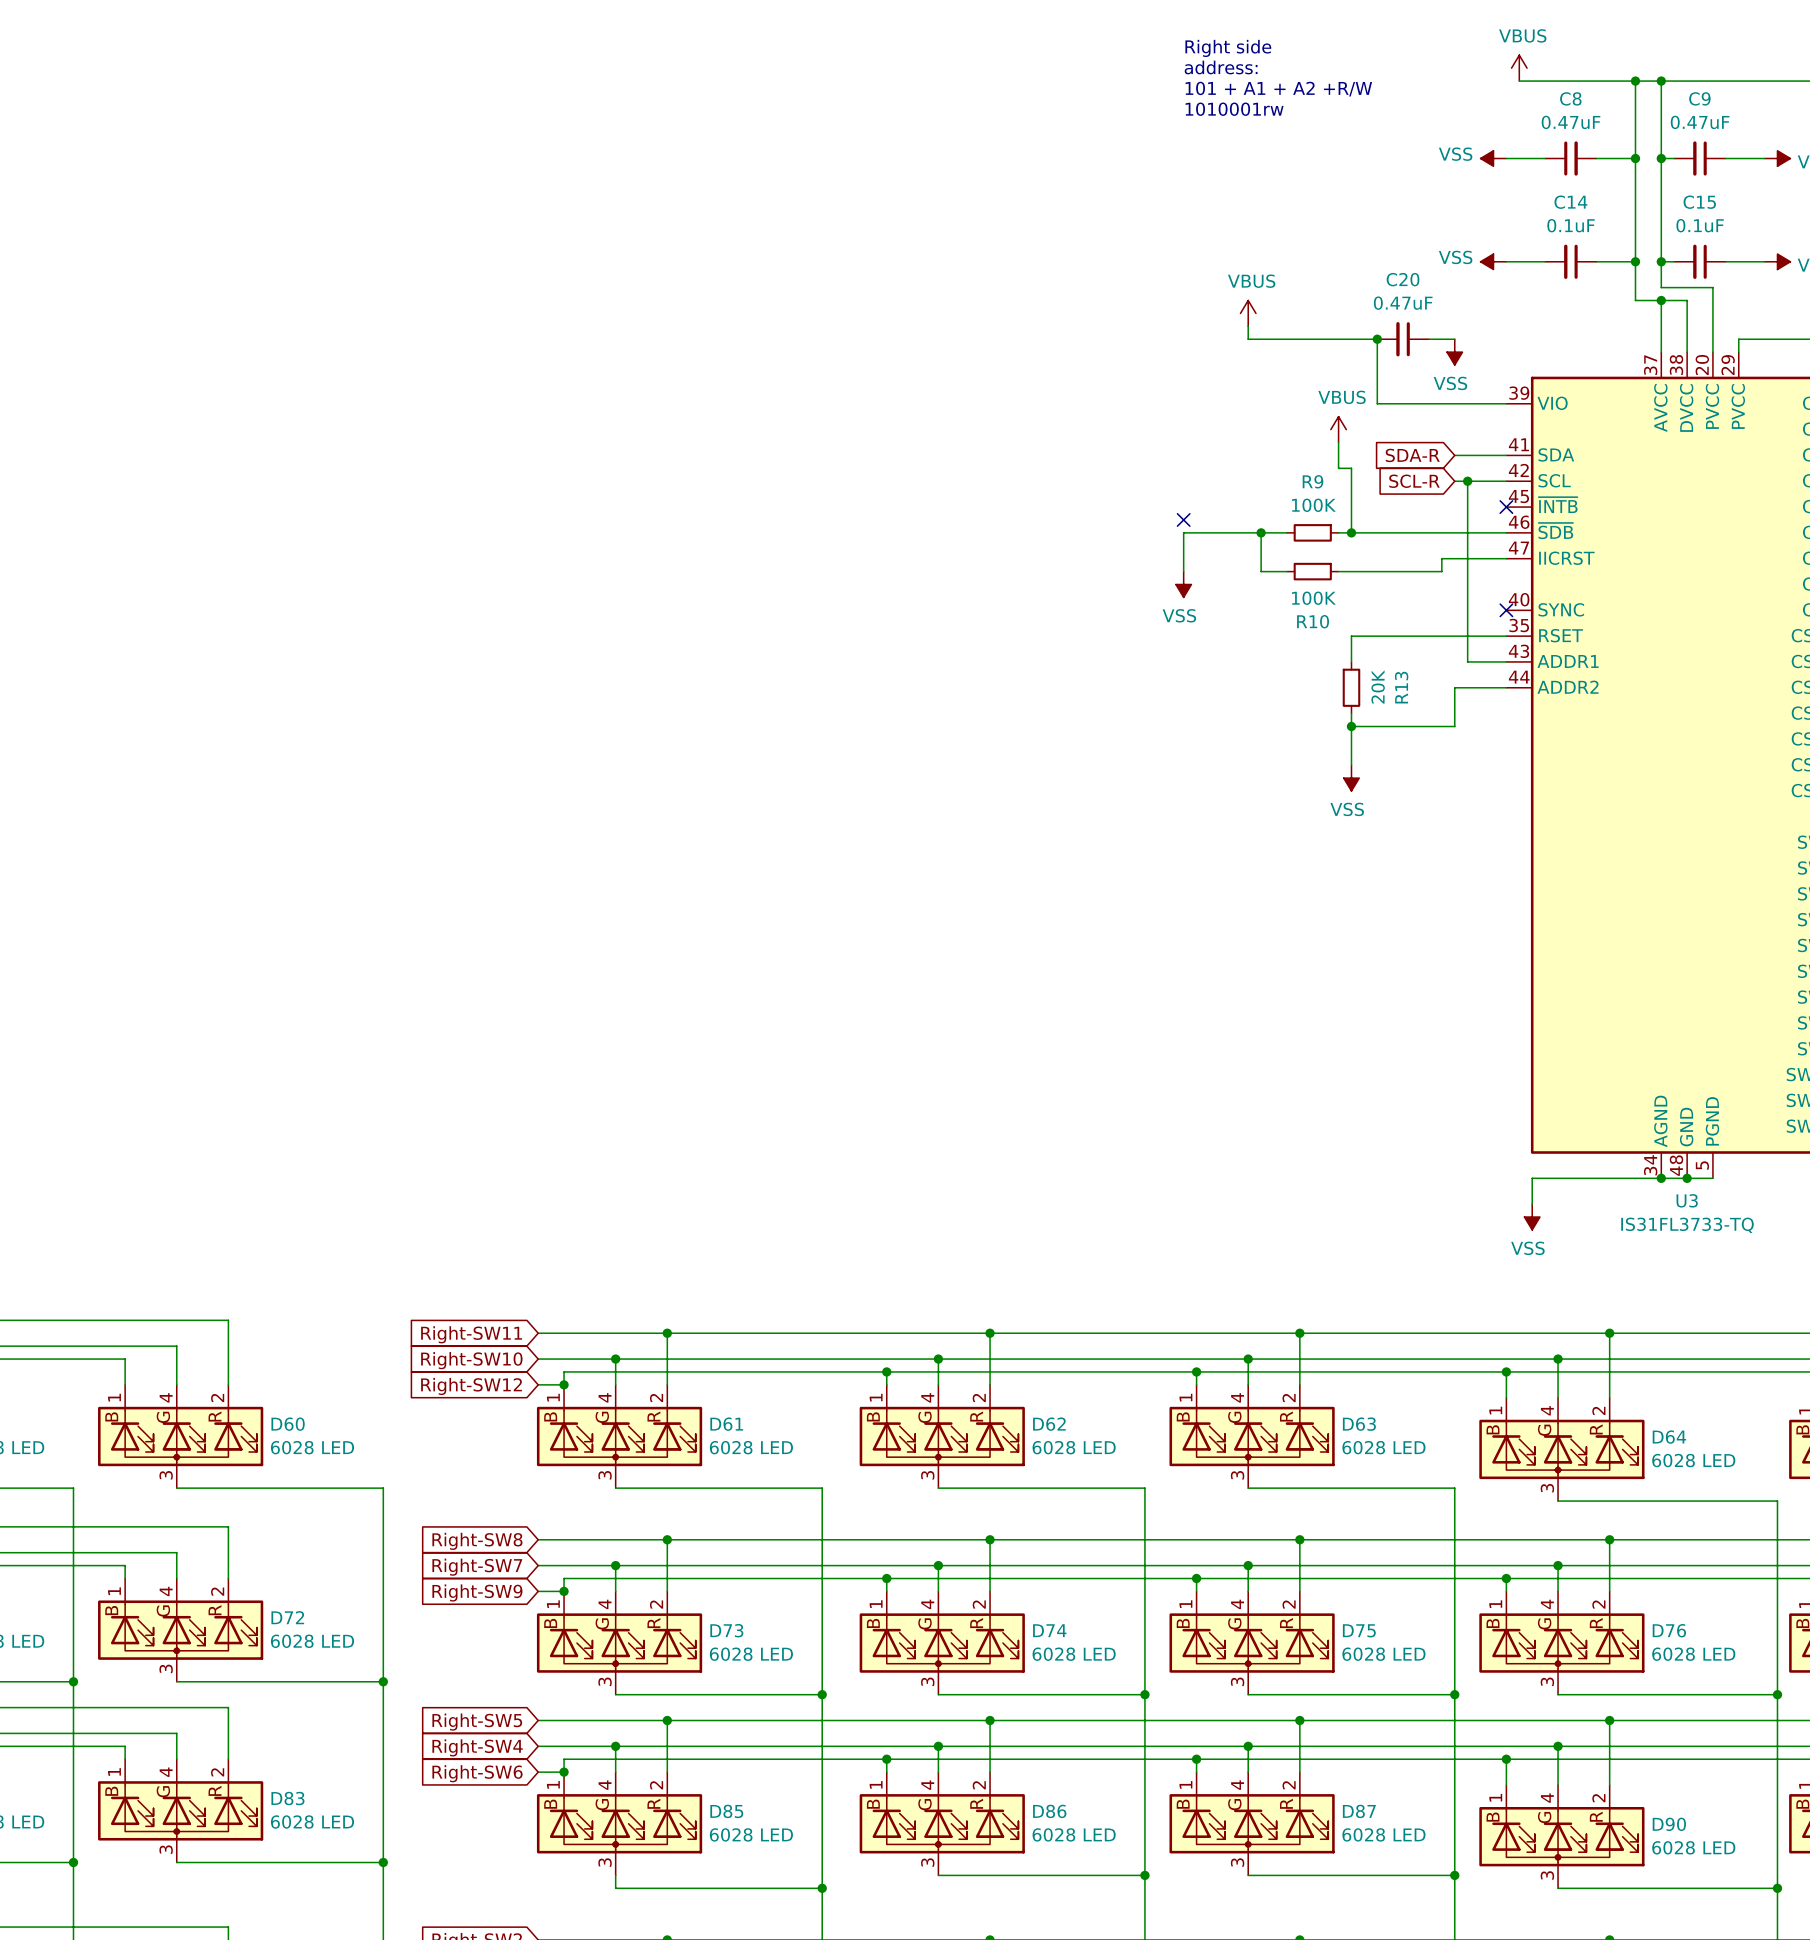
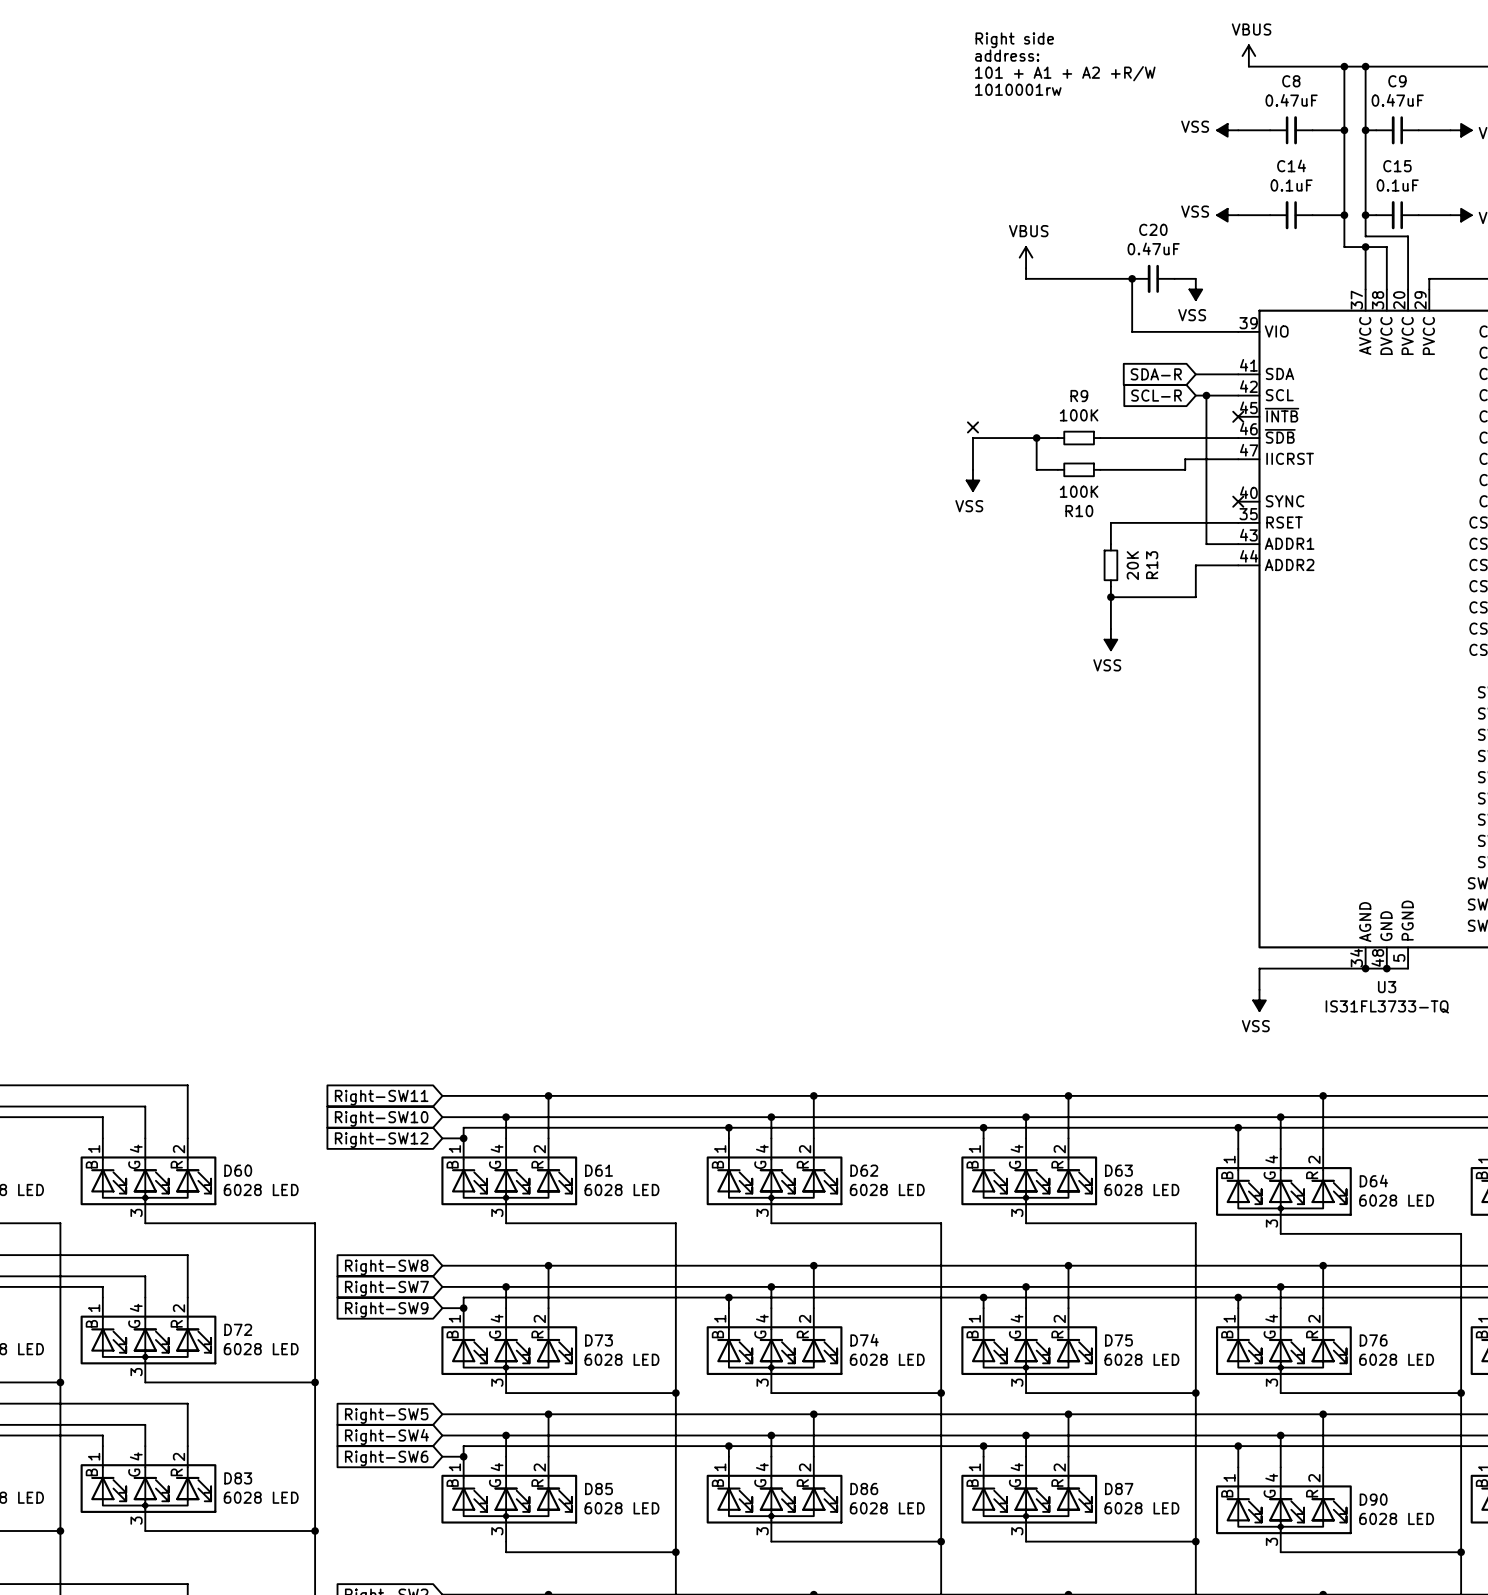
power symbol: VBUS (1338, 429) -> none
wire: (1338, 442) (1338, 468) (1351, 468) (1351, 532) -> none
junction: (1351, 532) -> none

